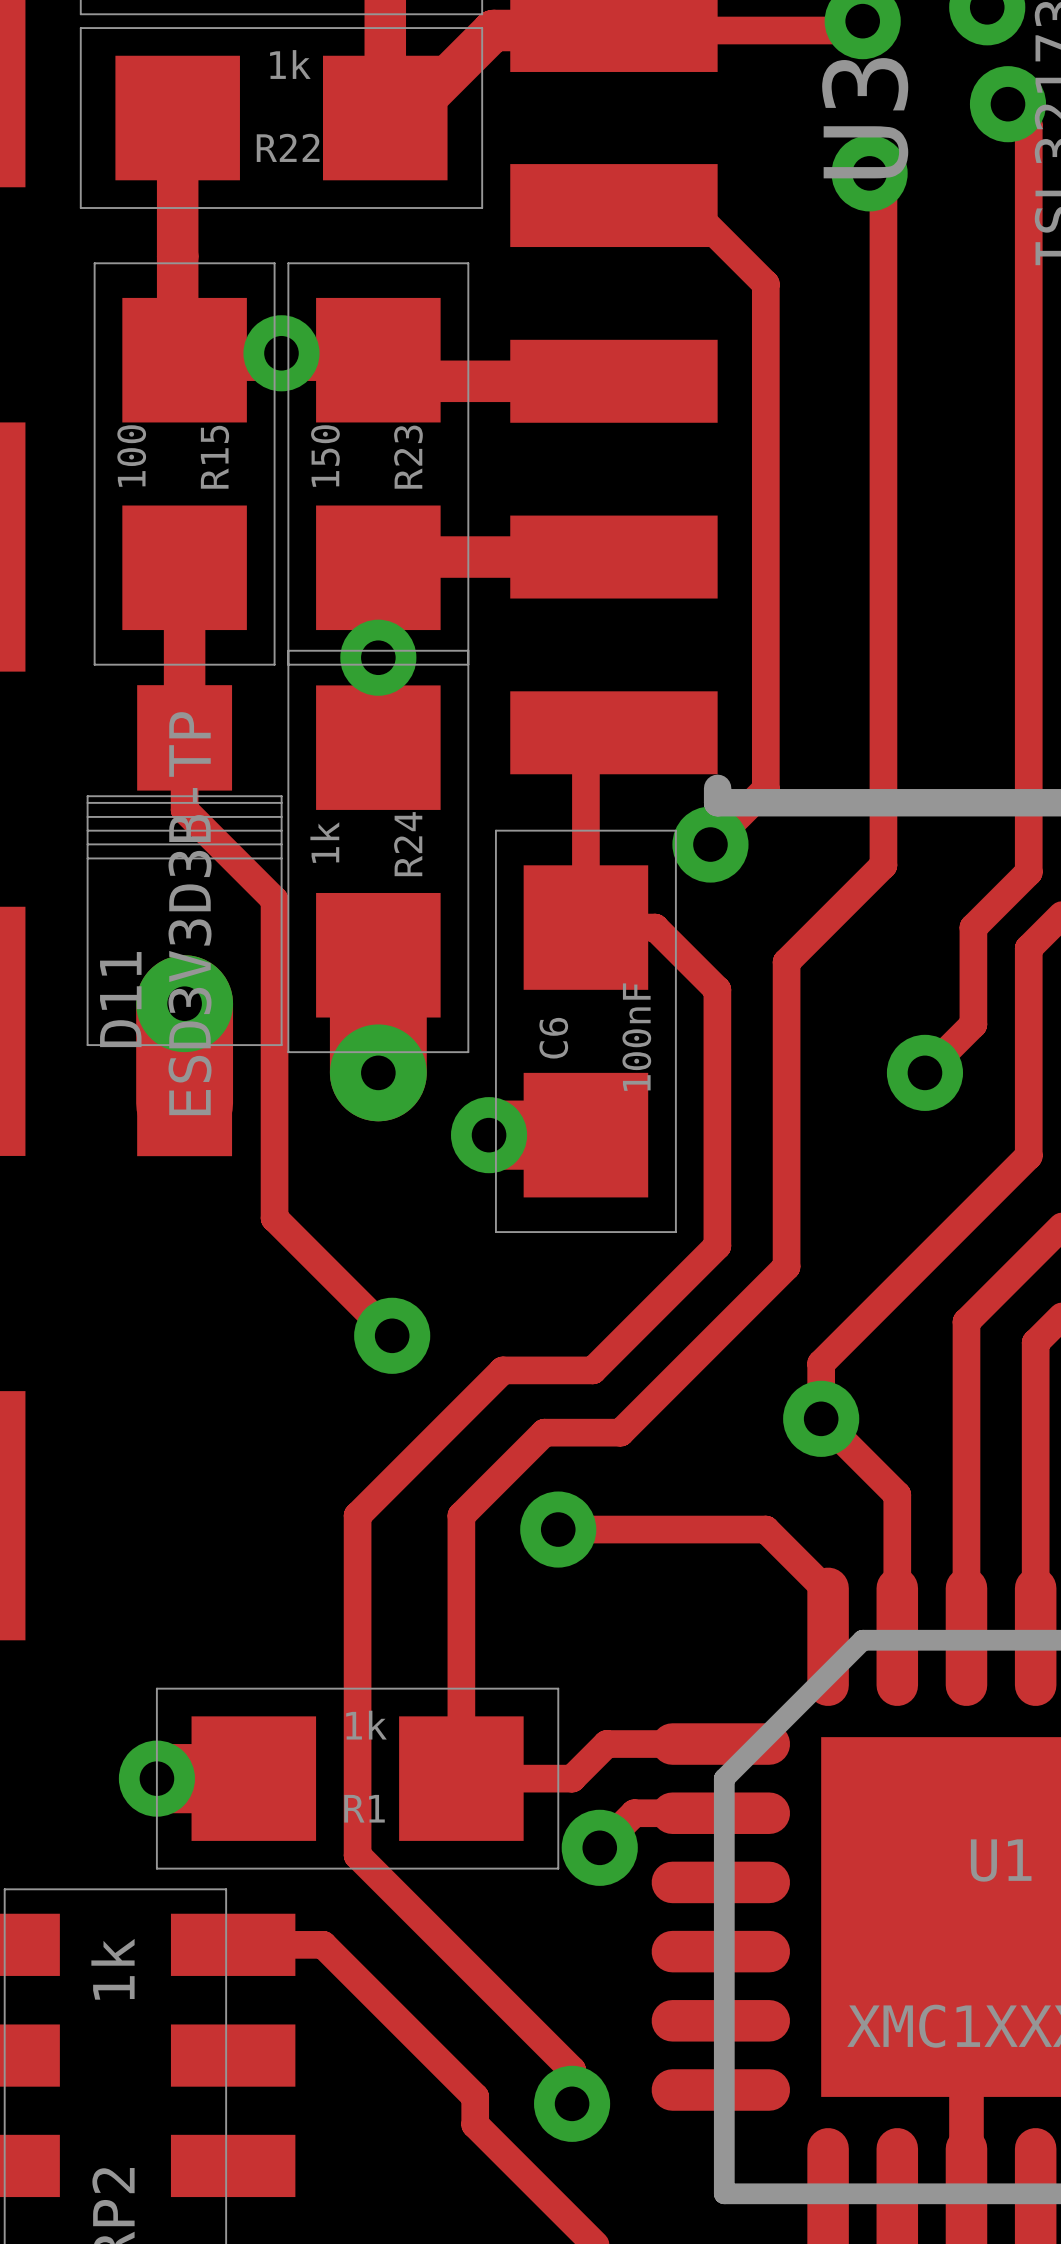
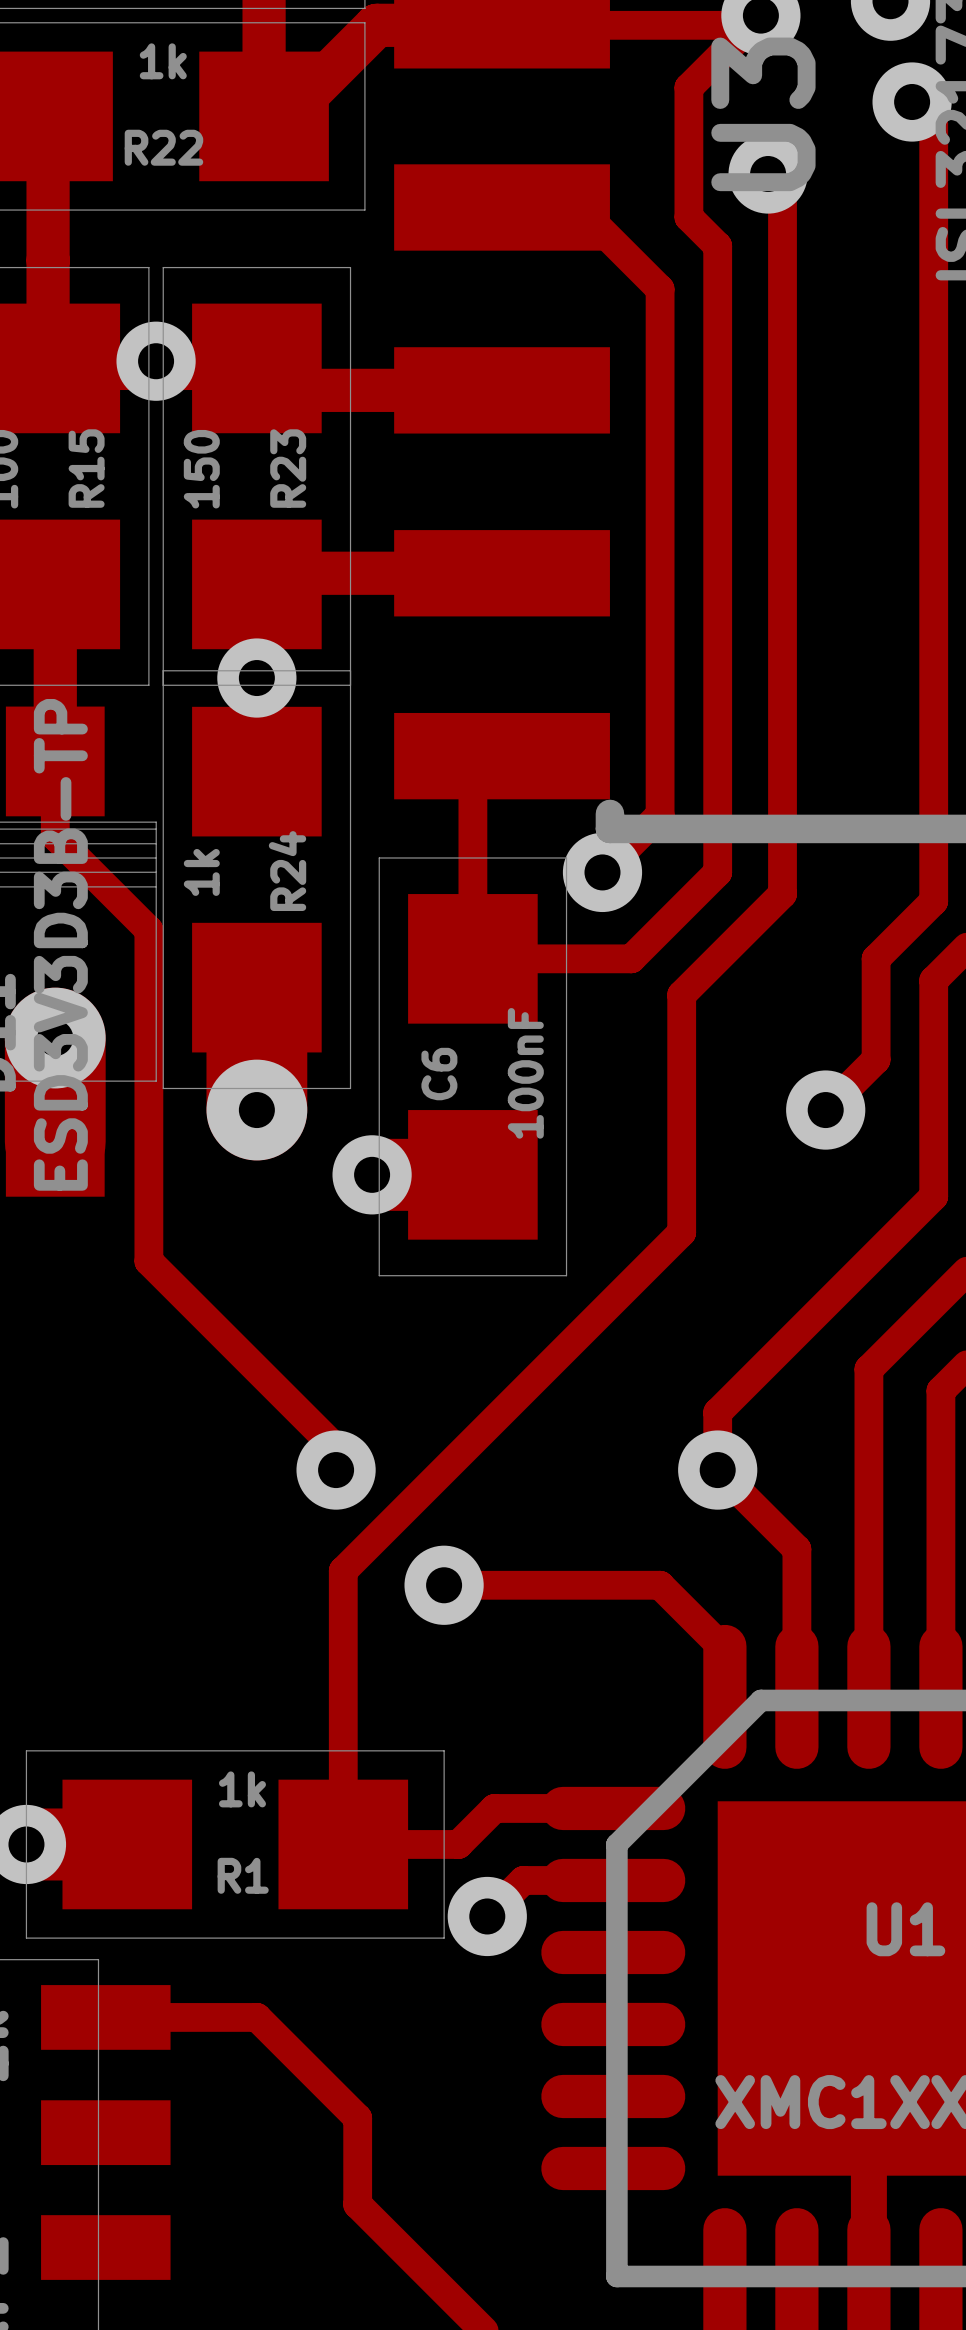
track: (655, 927) (717, 989) (717, 1245) (592, 1370) (502, 1370) (357, 1515) (357, 1855) (572, 2069) (572, 2103) -> (544, 958) (631, 958) (717, 872) (717, 246) (688, 217) (688, 87) (751, 25)
track: (786, 1190) (786, 1266) (620, 1432) (544, 1432) -> (681, 1232) (429, 1484)
track: none -> (271, 1383) (336, 1448) (336, 1470)
via position: (392, 1335) -> (336, 1470)
track: (323, 1944) (475, 2096) -> (199, 2017) (257, 2017) (357, 2118) (357, 2175)
via: (572, 2103) -> none

